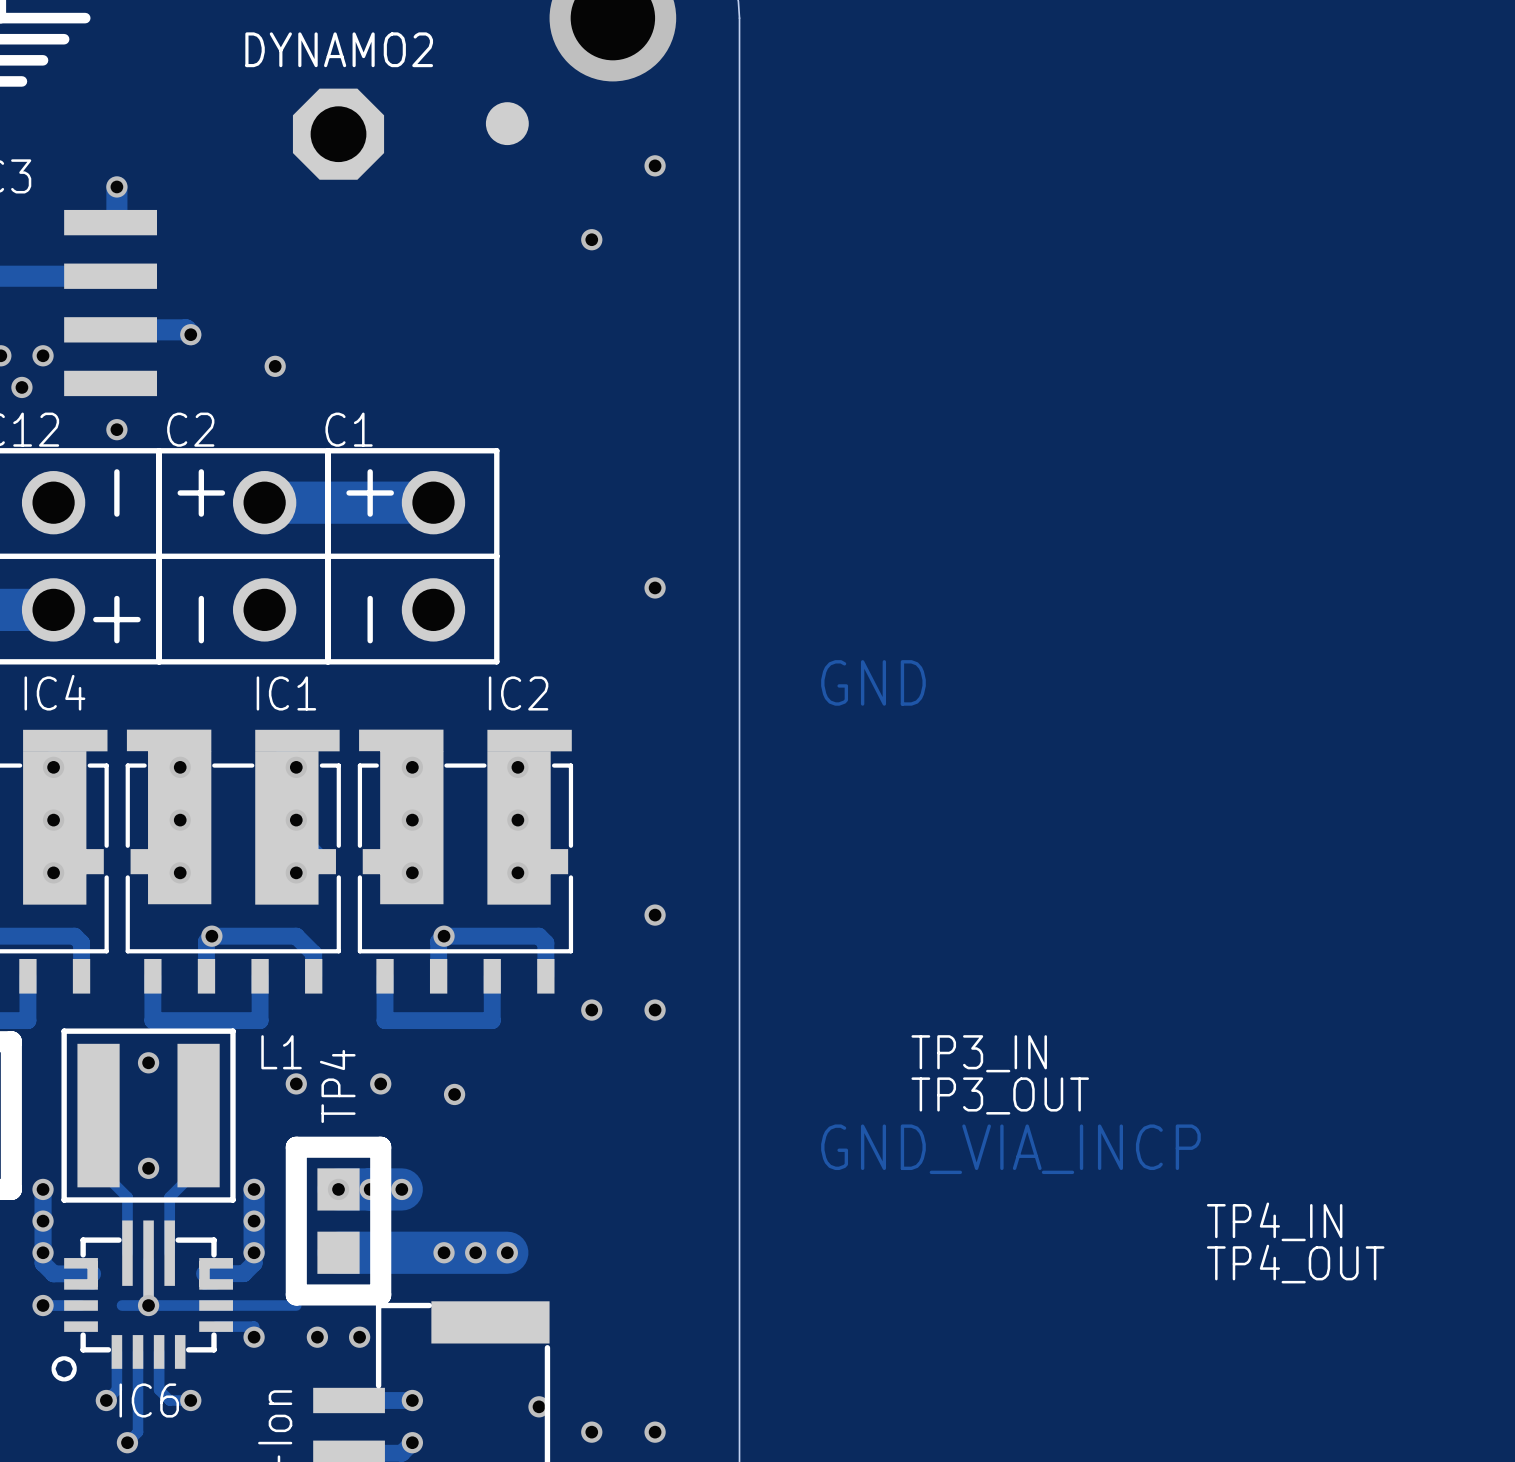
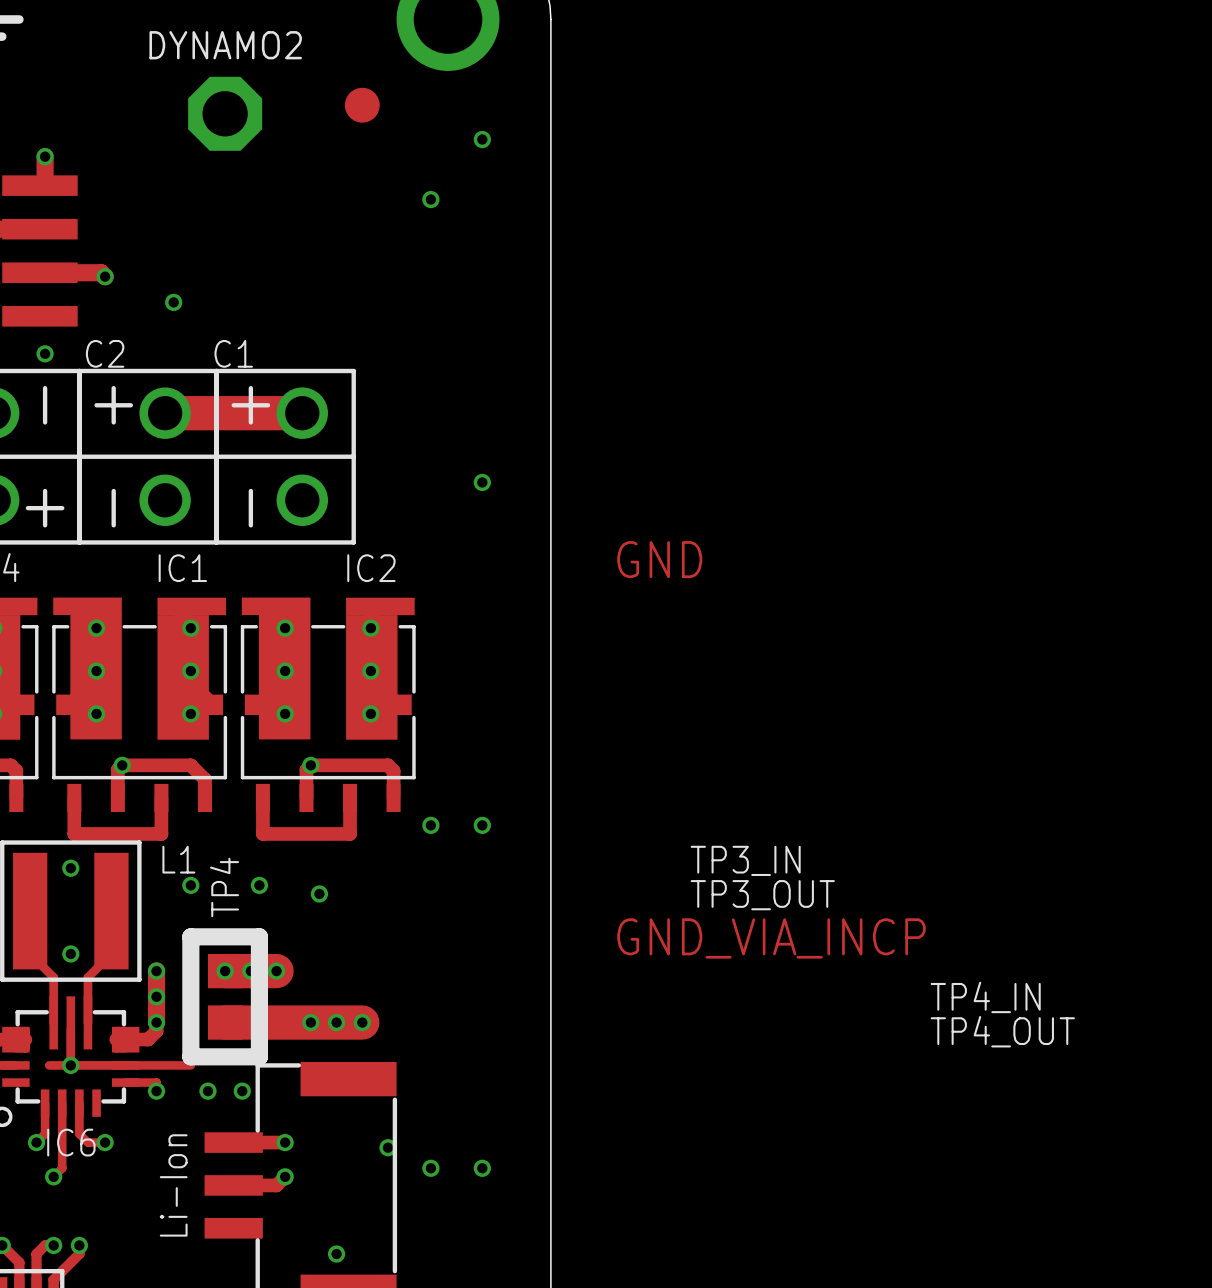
via: (655, 915) -> none

